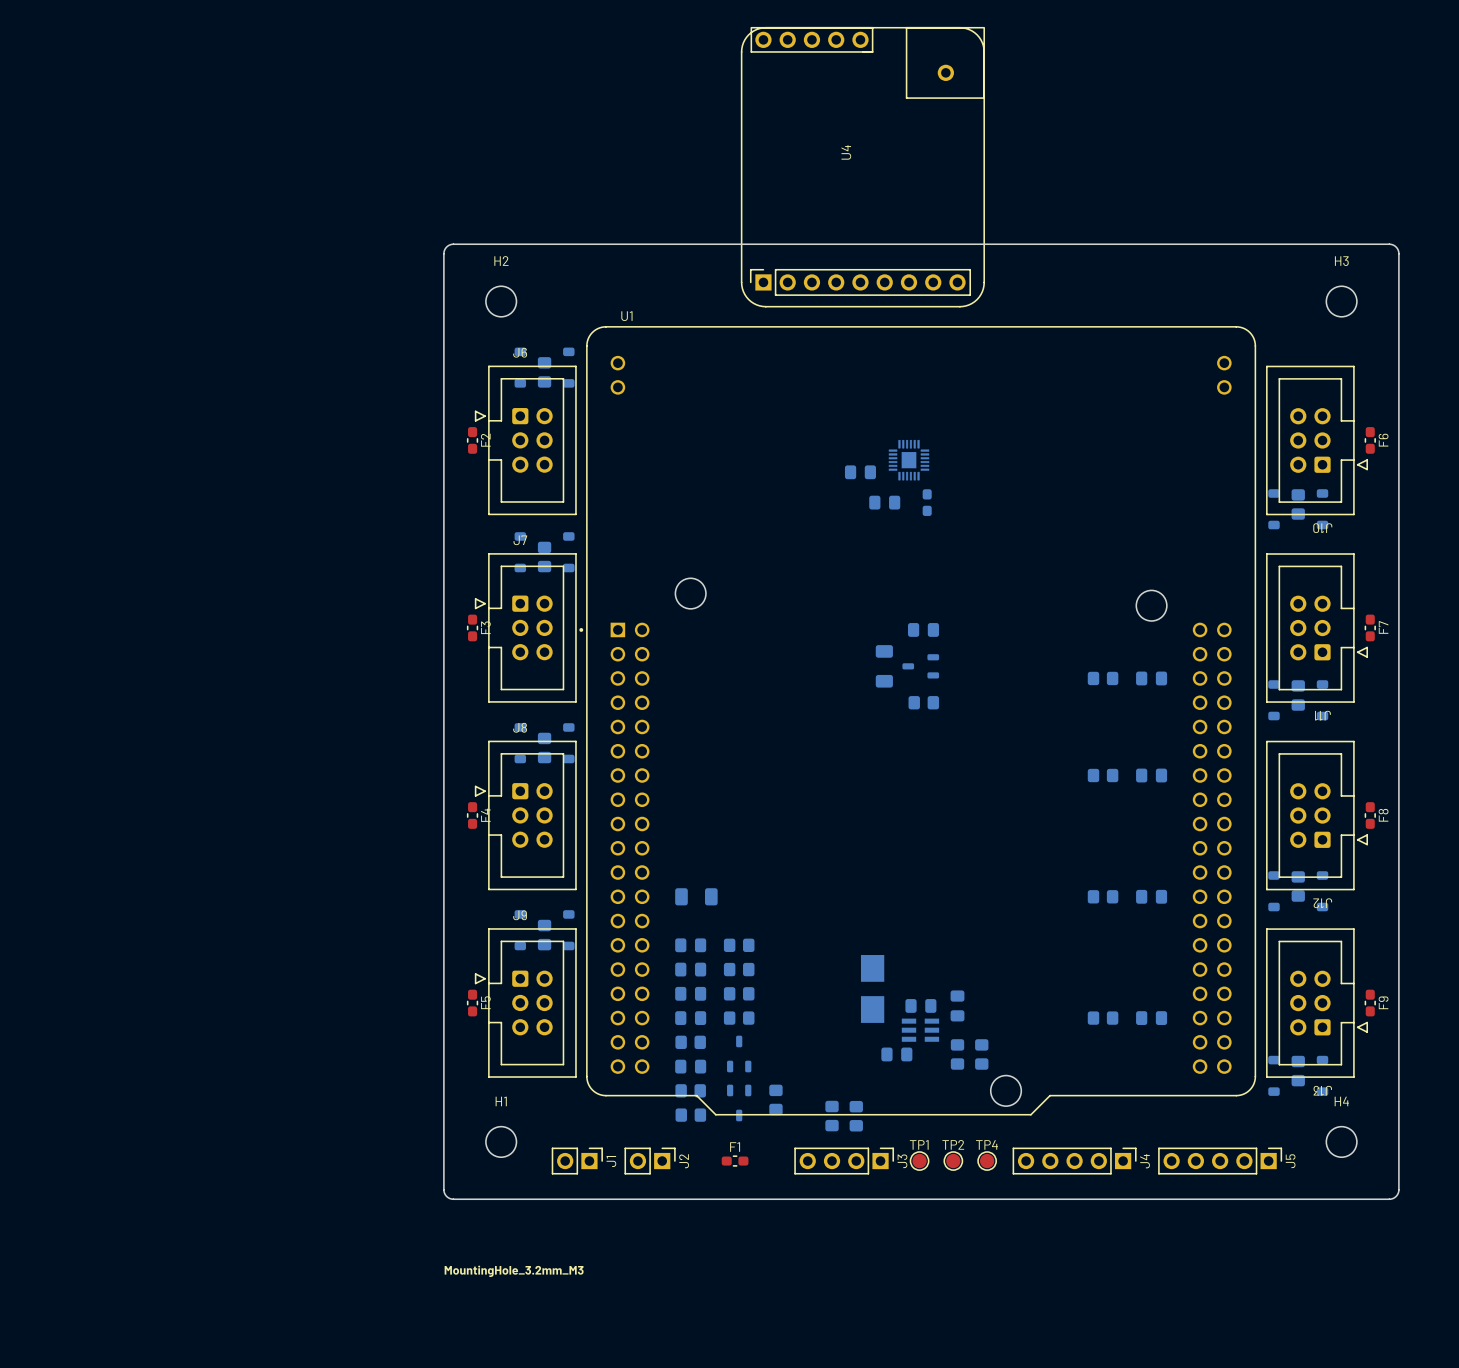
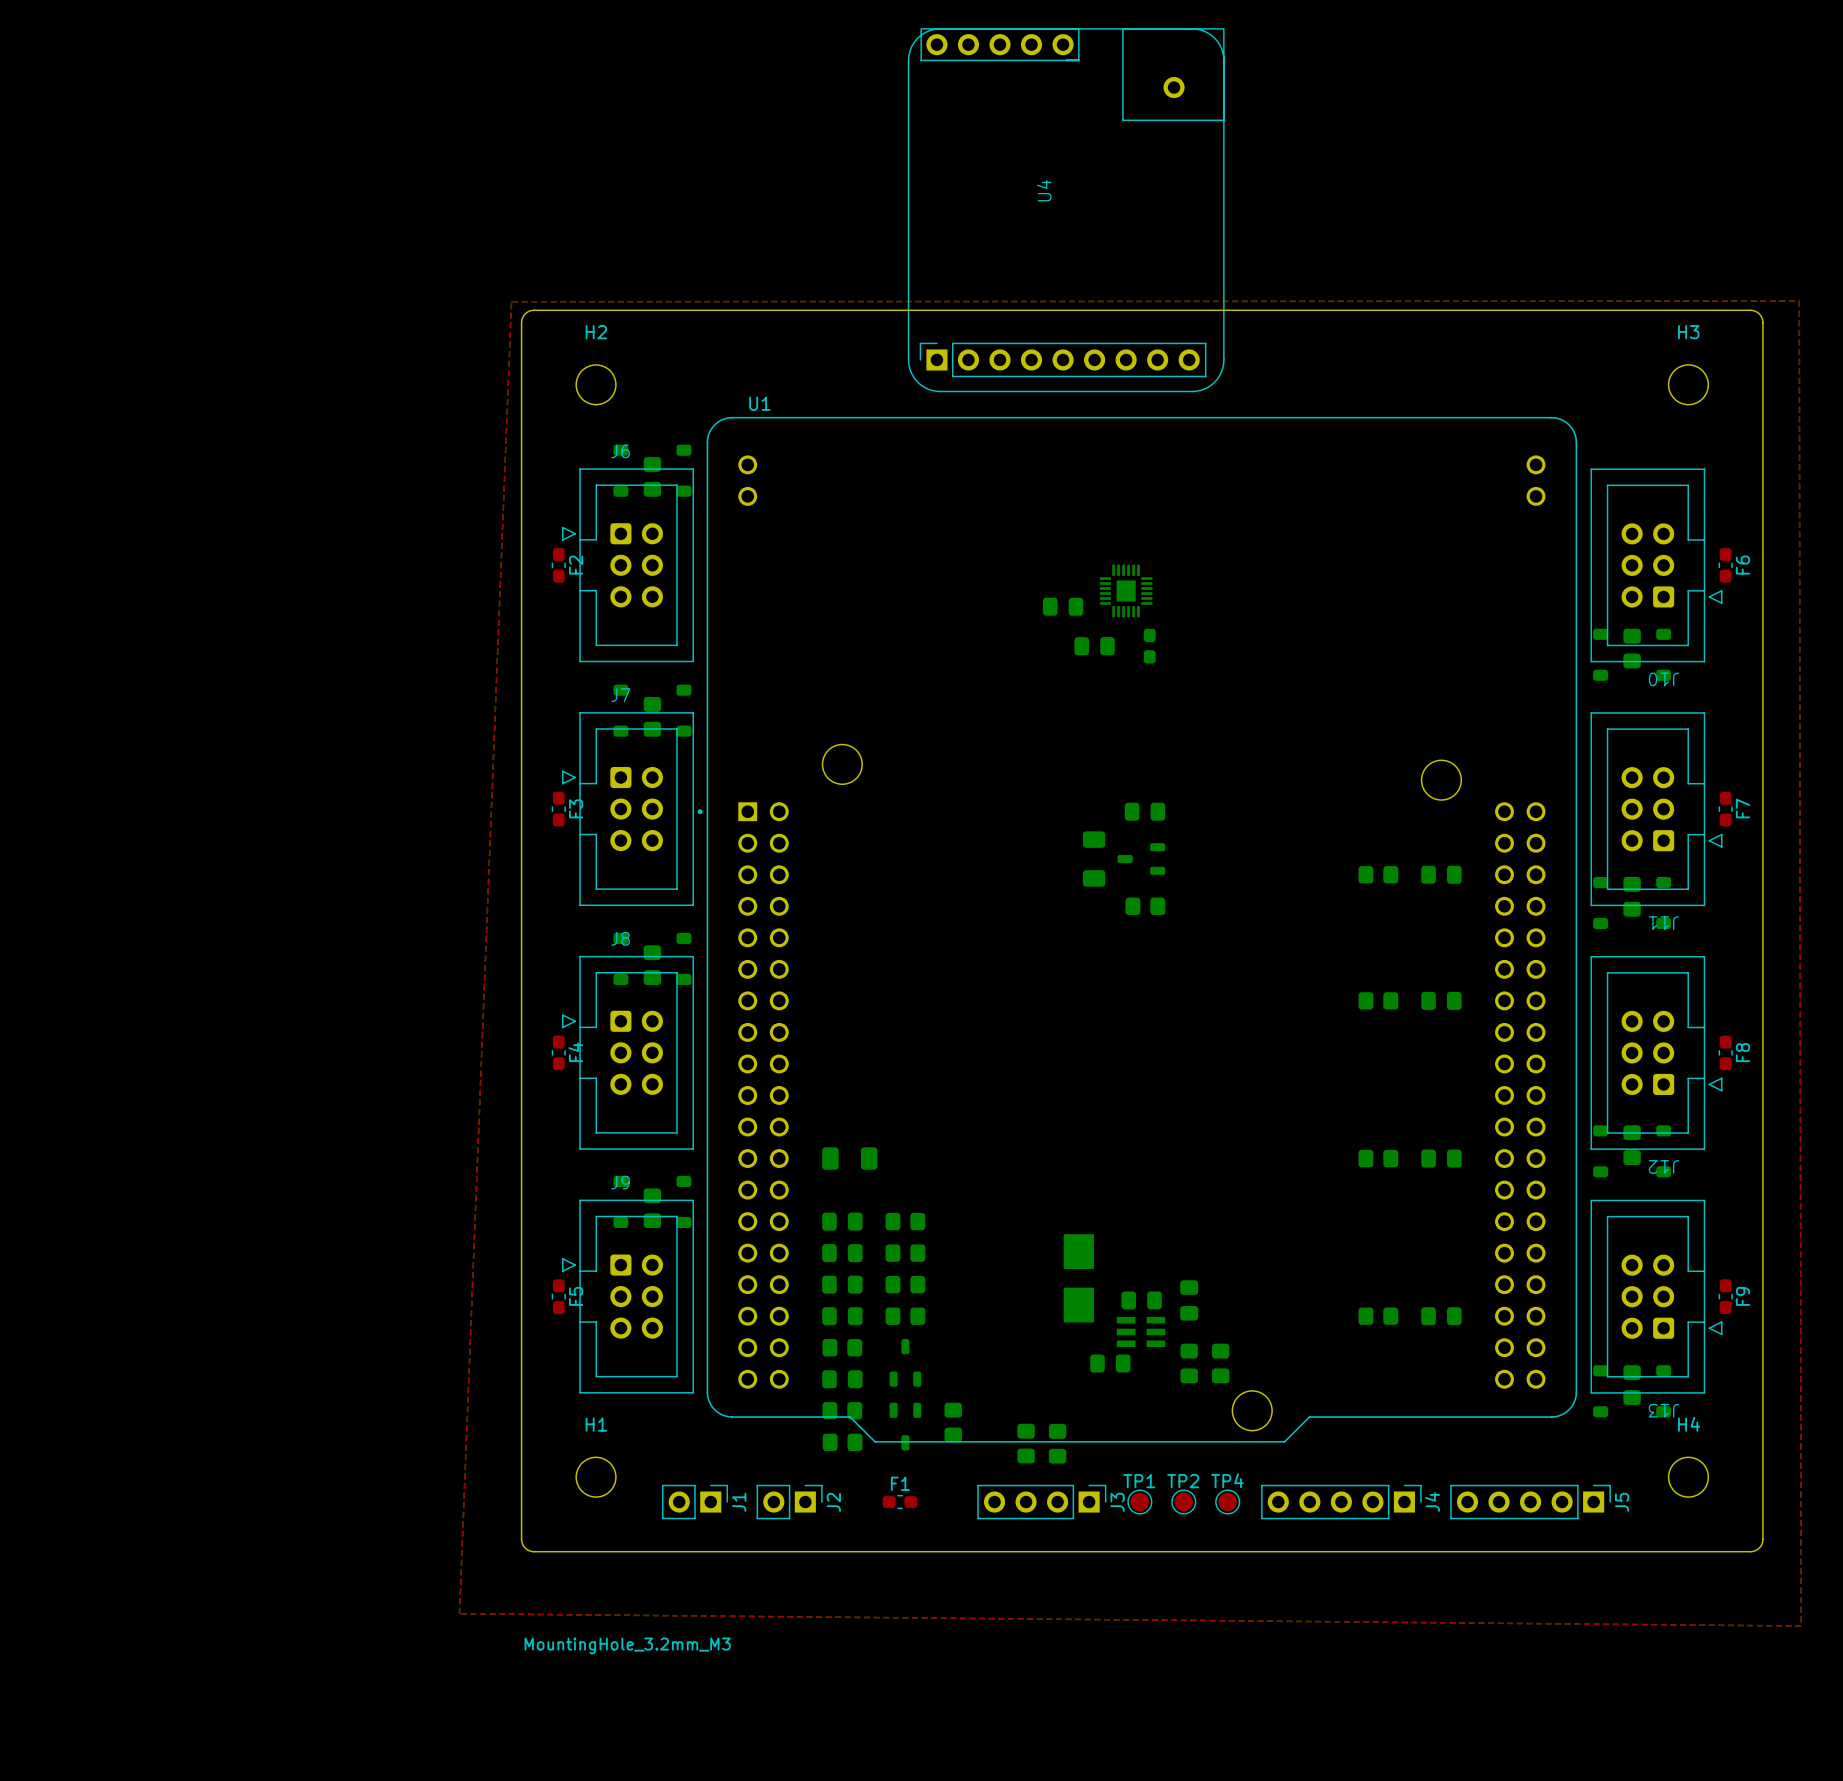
top zone outline: none -> (511, 301) (459, 1613) (1801, 1626) (1799, 301) (511, 301)

